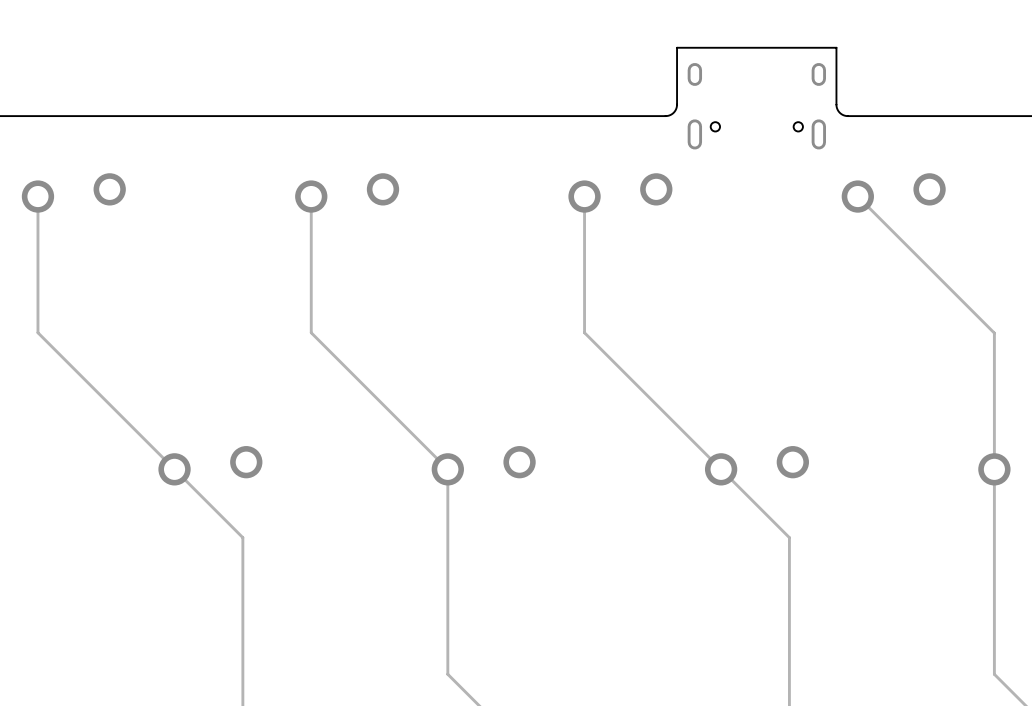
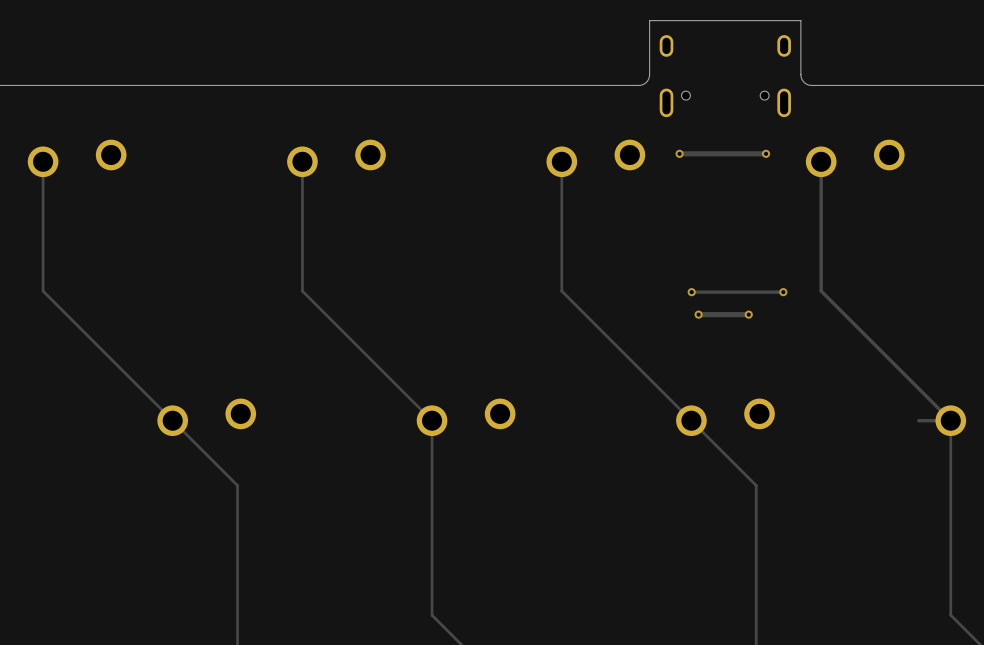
via: none -> (679, 153)
track: none -> (766, 153) (681, 153) (679, 155)
via: none -> (766, 153)
track: (857, 196) (994, 333) (994, 469) -> (821, 161) (821, 291) (950, 420) (918, 420)
via: none -> (691, 292)
track: none -> (783, 292) (691, 292) (693, 293)
via: none -> (783, 292)
track: none -> (698, 314) (748, 314)
via: none -> (698, 314)
via: none -> (748, 314)

